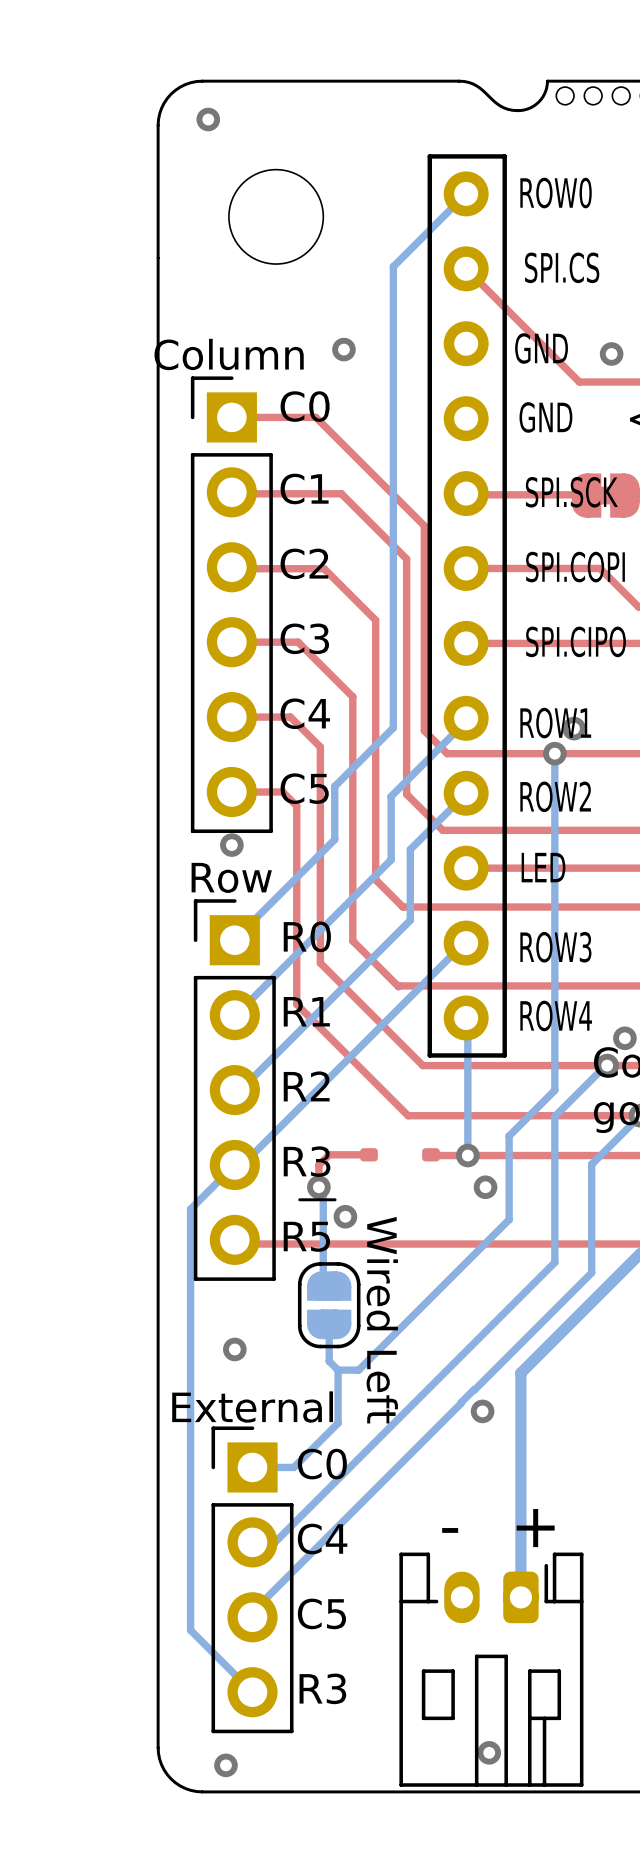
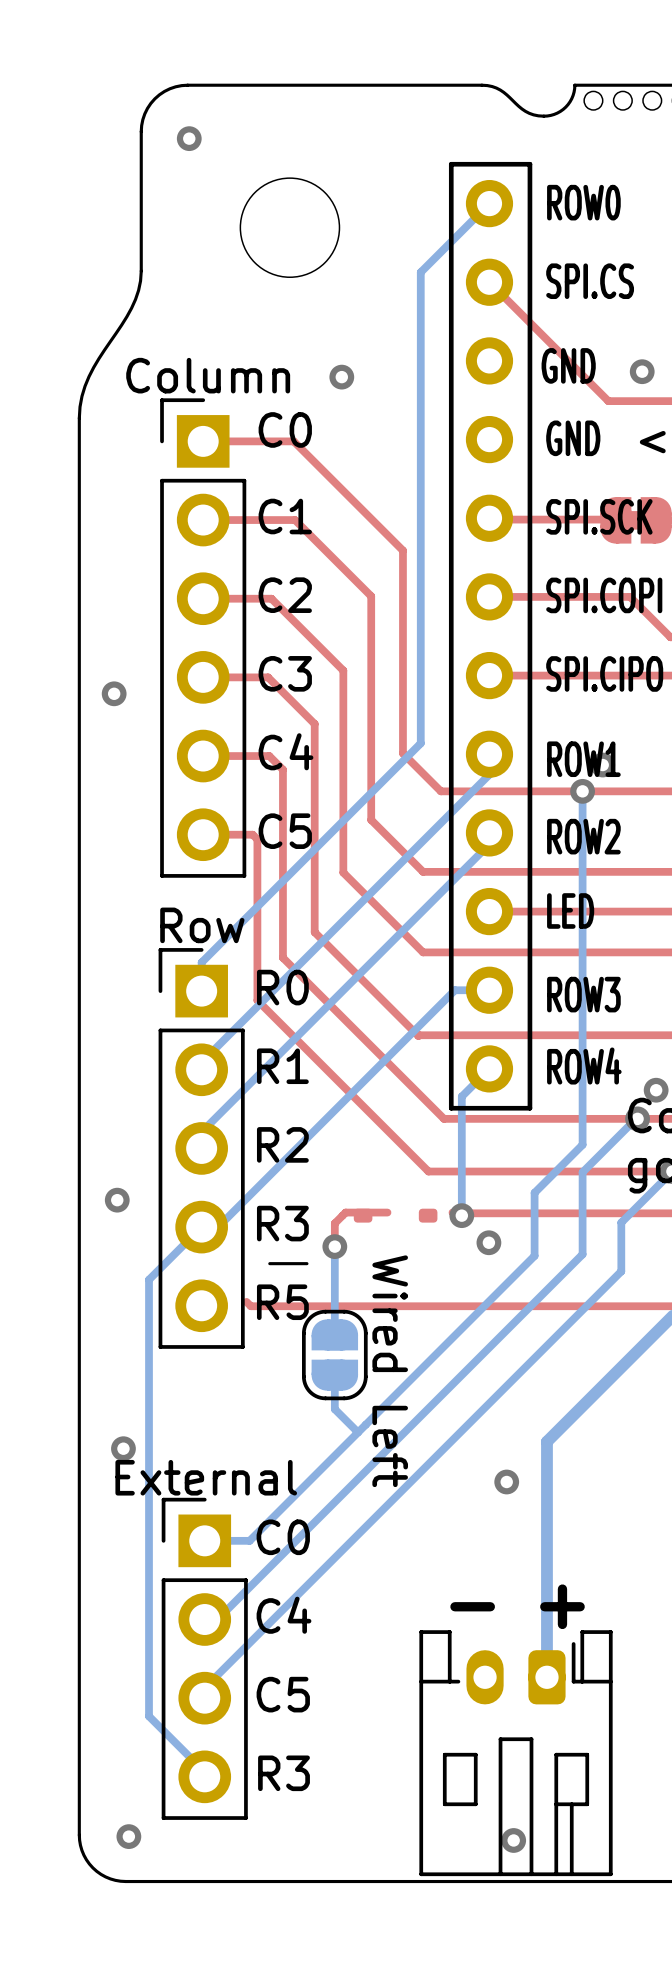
board edge: (202, 81) (185, 84) (171, 94) (161, 108) (158, 125) (158, 1747) (161, 1764) (171, 1778) (185, 1788) (202, 1791) -> (212, 85) (181, 85) (169, 88) (154, 98) (144, 113) (141, 131) (141, 271) (138, 290) (126, 316) (89, 376) (81, 396) (79, 418) (79, 1840) (81, 1850) (89, 1864) (96, 1871) (110, 1878) (125, 1881) (212, 1881)
via position: (208, 119) -> (189, 138)
bottom track: (400, 259) (393, 266) (393, 727) (334, 786) (334, 839) (234, 940) -> (420, 272) (420, 743) (201, 962) (201, 991)
via position: (343, 349) -> (341, 377)
top track: (231, 417) (315, 417) (424, 525) (424, 730) (447, 753) -> (203, 441) (293, 441) (402, 550) (402, 753) (440, 791) (469, 791)
top track: (231, 492) (341, 493) (406, 558) (406, 794) (442, 830) -> (203, 520) (295, 520) (371, 596) (371, 820) (423, 871) (464, 871)
top track: (231, 567) (324, 568) (375, 620) (375, 879) -> (203, 598) (271, 598) (343, 670) (343, 872) (394, 923)
part position: (231, 604) -> (203, 638)
top track: (231, 642) (298, 642) (352, 696) (352, 940) -> (203, 677) (268, 677) (314, 723) (314, 932) (370, 988)
via: none -> (114, 693)
top track: (231, 717) (290, 717) (320, 747) (320, 963) -> (203, 756) (269, 756) (282, 769) (282, 957) (336, 1011)
bottom track: (466, 721) (391, 796) (391, 859) (234, 1015) -> (489, 757) (489, 774) (201, 1062) (201, 1069)
top track: (231, 792) (282, 792) (296, 806) (296, 1004) -> (203, 834) (252, 834) (257, 839) (257, 1000) (311, 1054)
bottom track: (466, 793) (410, 849) (410, 920) (240, 1090) (234, 1090) -> (489, 833) (489, 844) (201, 1132) (201, 1148)
via: (231, 845) -> none
bottom track: (464, 943) (242, 1164) (234, 1164) (190, 1209) (190, 1630) (252, 1692) -> (487, 990) (454, 990) (218, 1227) (201, 1227) (149, 1279) (149, 1716) (204, 1772) (204, 1776)
bottom track: (466, 1018) (467, 1019) (467, 1155) -> (489, 1068) (461, 1096) (461, 1215)
part position: (265, 1090) -> (233, 1148)
via: none -> (117, 1200)
part position: (399, 1154) -> (395, 1215)
via: (467, 1155) -> none
via: none -> (461, 1215)
bottom track: (318, 1187) (323, 1191) (323, 1280) (329, 1286) -> (334, 1246) (334, 1334)
via position: (485, 1187) -> (488, 1242)
bottom track: (554, 1194) (554, 1262) (274, 1542) (252, 1542) -> (582, 1254) (217, 1619) (204, 1619)
bottom track: (509, 1196) (509, 1219) (358, 1370) (338, 1370) -> (534, 1255) (249, 1540) (204, 1540)
bottom track: (591, 1210) (591, 1272) (252, 1611) (252, 1617) -> (621, 1271) (204, 1687) (204, 1698)
via: (345, 1216) -> none
part position: (329, 1305) -> (334, 1355)
bottom track: none -> (334, 1375) (334, 1409) (358, 1432)
bottom track: (329, 1324) (329, 1361) (338, 1370) -> none
via: (234, 1349) -> none
bottom track: (338, 1370) (338, 1423) (293, 1467) (252, 1467) -> none
via: none -> (123, 1448)
part position: (252, 1579) -> (204, 1658)
via position: (225, 1765) -> (128, 1836)

